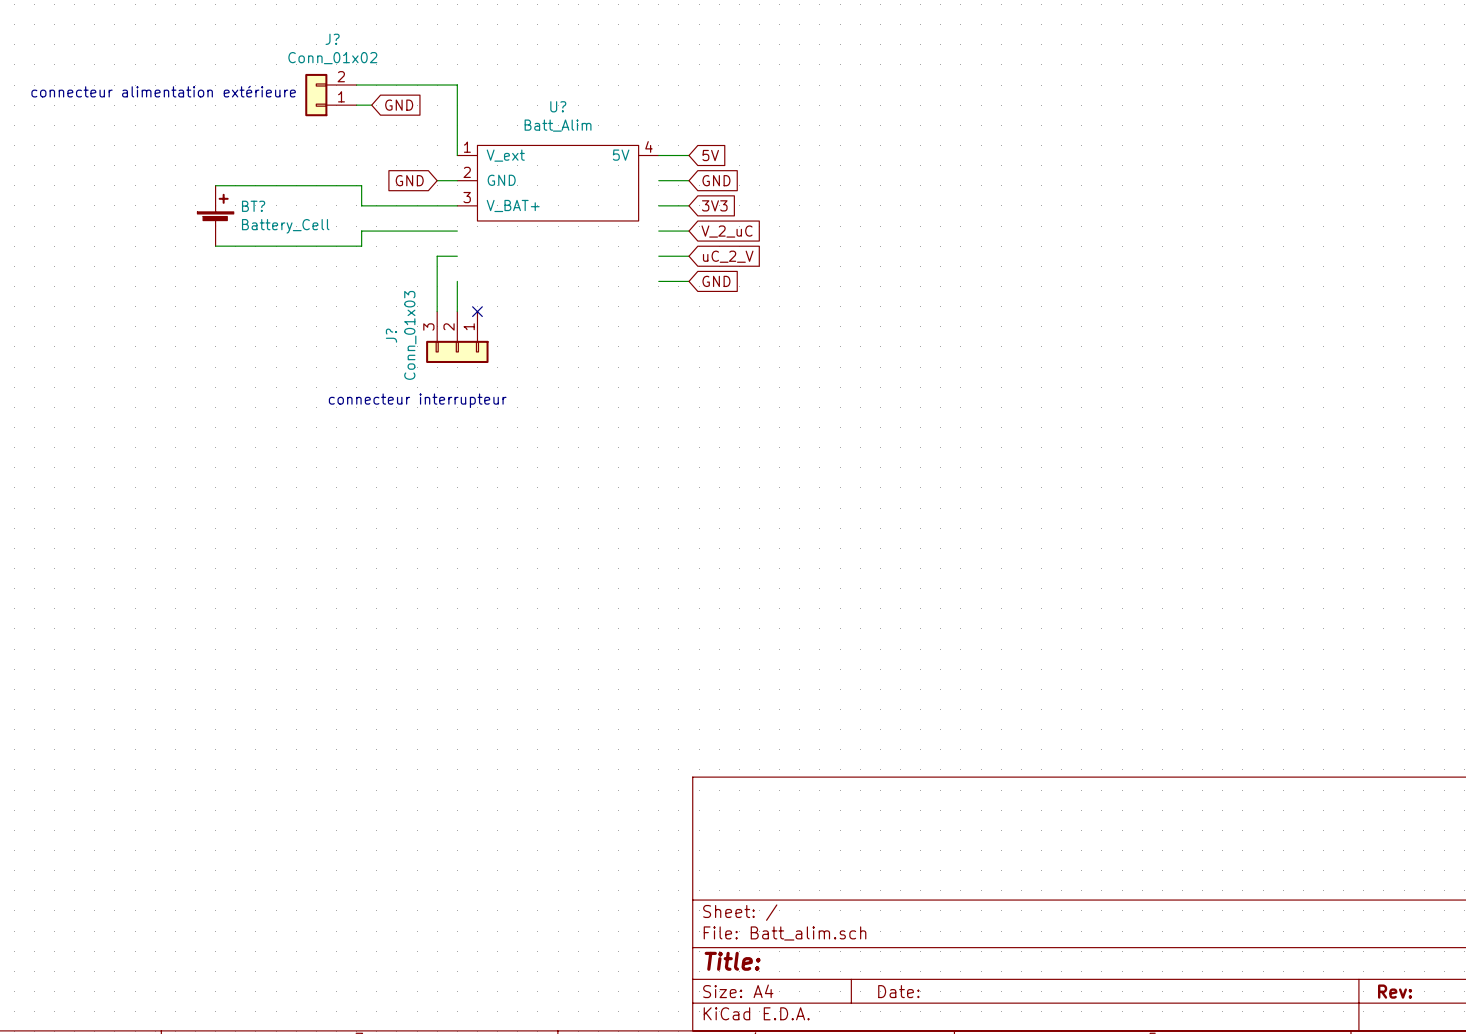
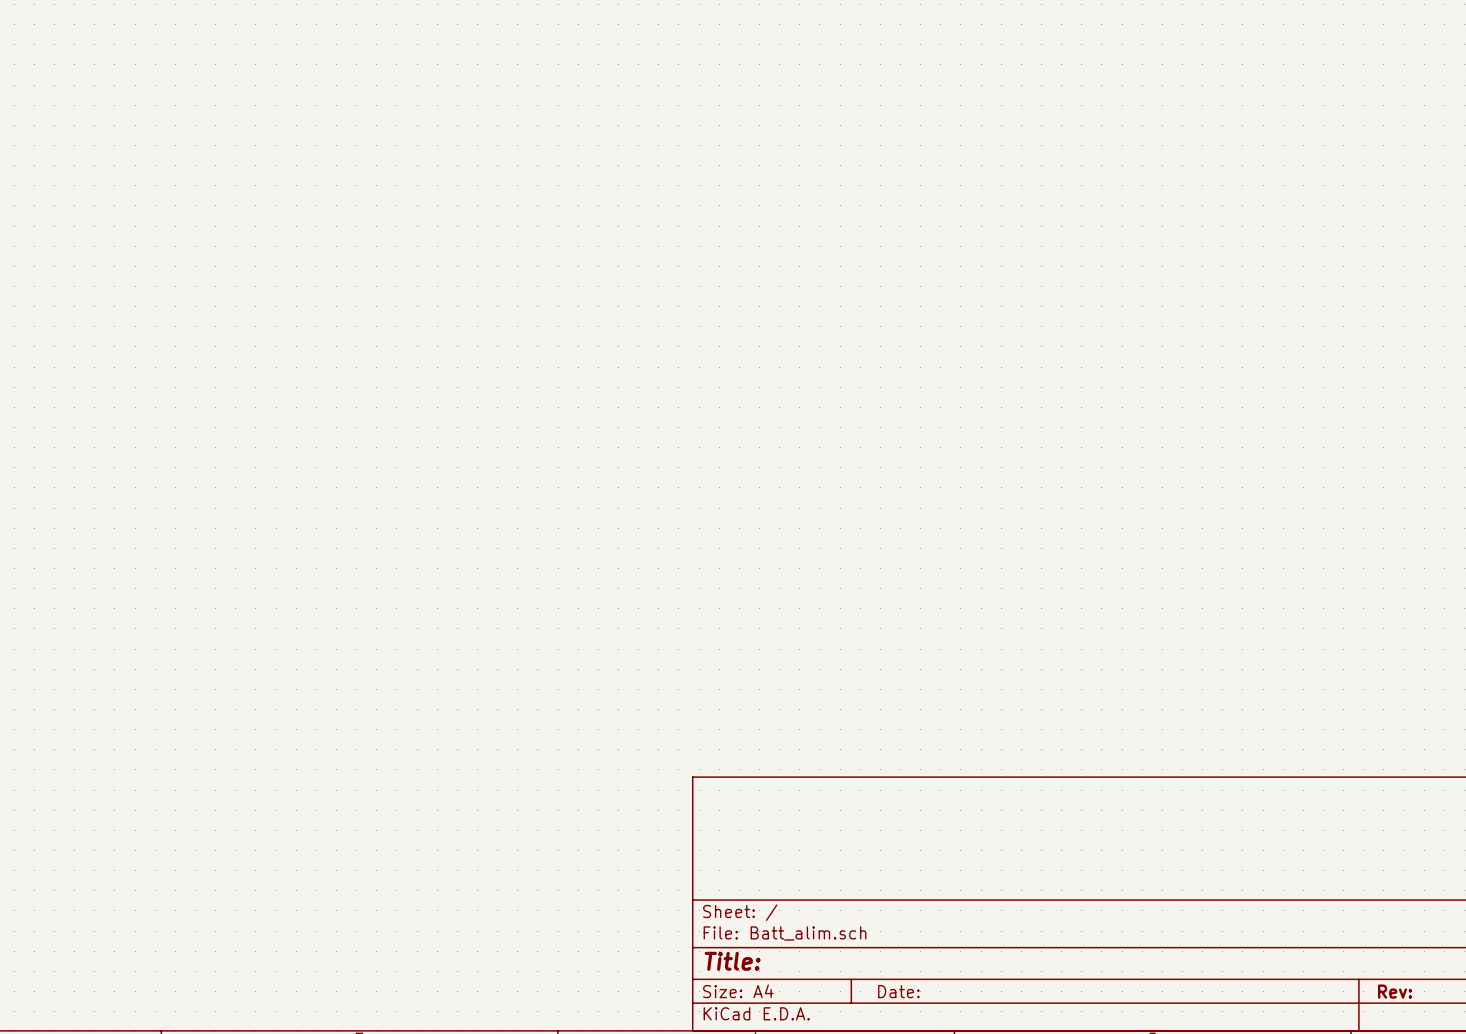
wire: (356, 85) (457, 85) (457, 155) -> none
text: connecteur alimentation extérieure (163, 91) -> none
J?: Conn_01x02 (330, 95) -> none
wire: (356, 105) (371, 105) -> none
global label: GND (399, 105) -> none
wire: (658, 155) (688, 155) -> none
global label: 5V (710, 155) -> none
global label: GND (409, 180) -> none
wire: (437, 180) (457, 180) -> none
wire: (658, 180) (688, 180) -> none
global label: GND (716, 180) -> none
U?: Batt_Alim (558, 183) -> none
wire: (215, 185) (361, 185) (361, 205) (457, 205) -> none
wire: (658, 205) (688, 205) -> none
global label: 3V3 (714, 205) -> none
BT?: Battery_Cell (215, 215) -> none
wire: (457, 231) (361, 231) (361, 246) (215, 246) -> none
wire: (658, 231) (688, 231) -> none
global label: V_2_uC (727, 231) -> none
wire: (457, 256) (437, 256) (437, 311) -> none
wire: (658, 256) (688, 256) -> none
global label: uC_2_V (728, 256) -> none
wire: (457, 281) (457, 311) -> none
wire: (658, 281) (688, 281) -> none
global label: GND (716, 281) -> none
no-connect mark: (477, 311) -> none
J?: Conn_01x03 (457, 337) -> none
text: connecteur interrupteur (417, 400) -> none

